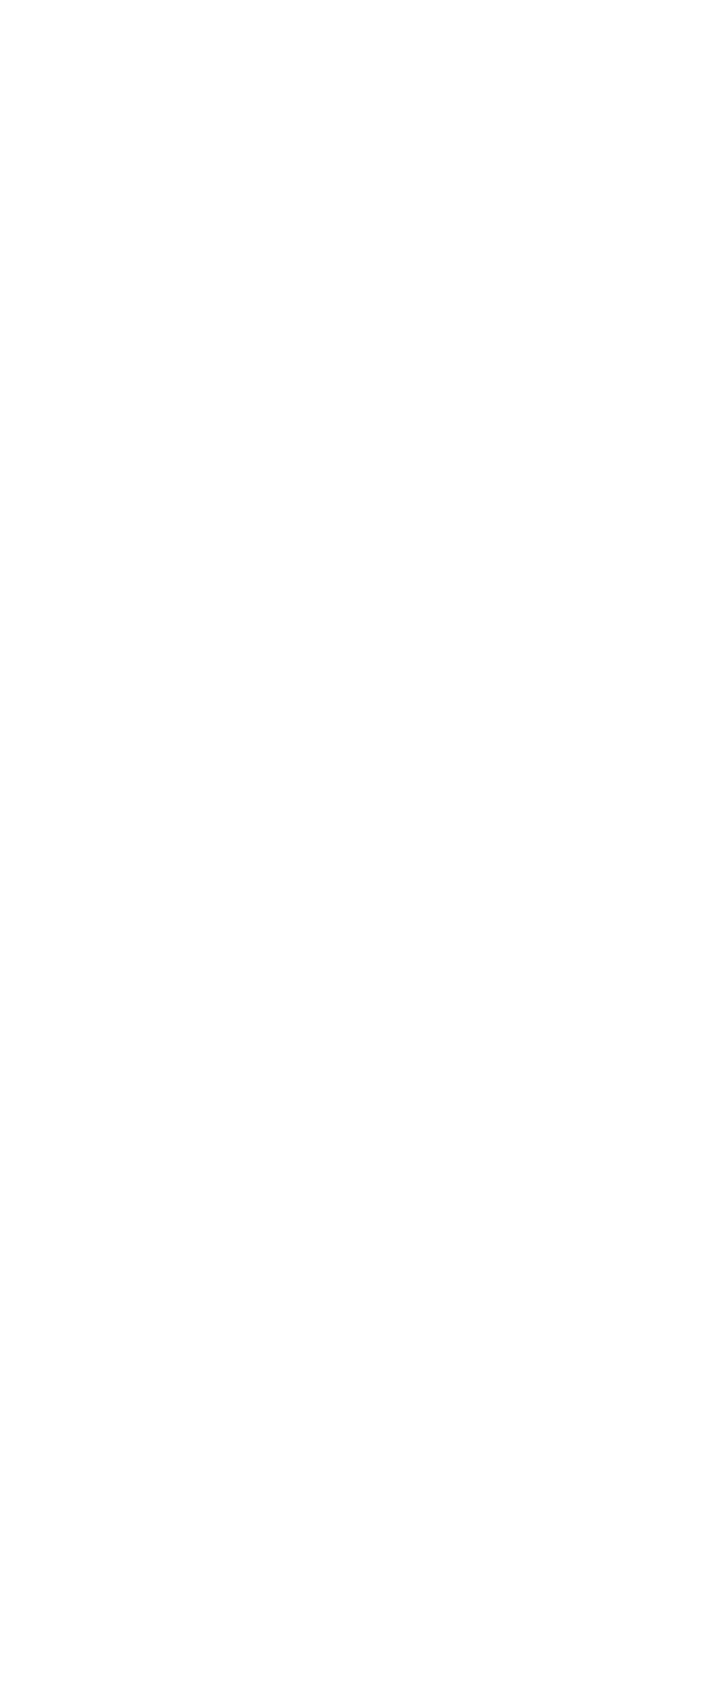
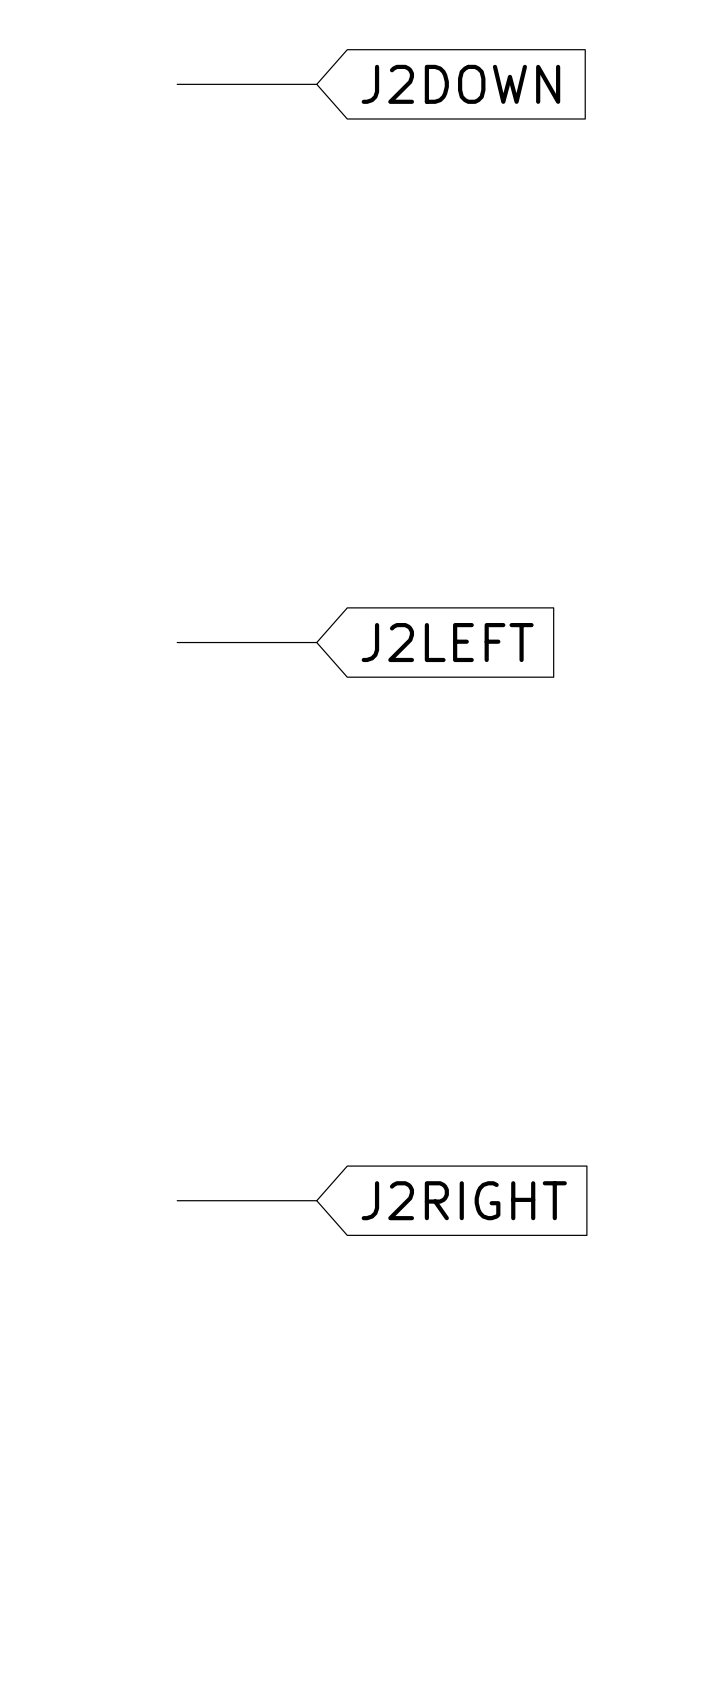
wire: none -> (177, 84) (316, 84)
global label: none -> J2DOWN (460, 84)
wire: none -> (177, 642) (316, 642)
global label: none -> J2LEFT (447, 642)
wire: none -> (177, 1200) (316, 1200)
global label: none -> J2RIGHT (464, 1200)

